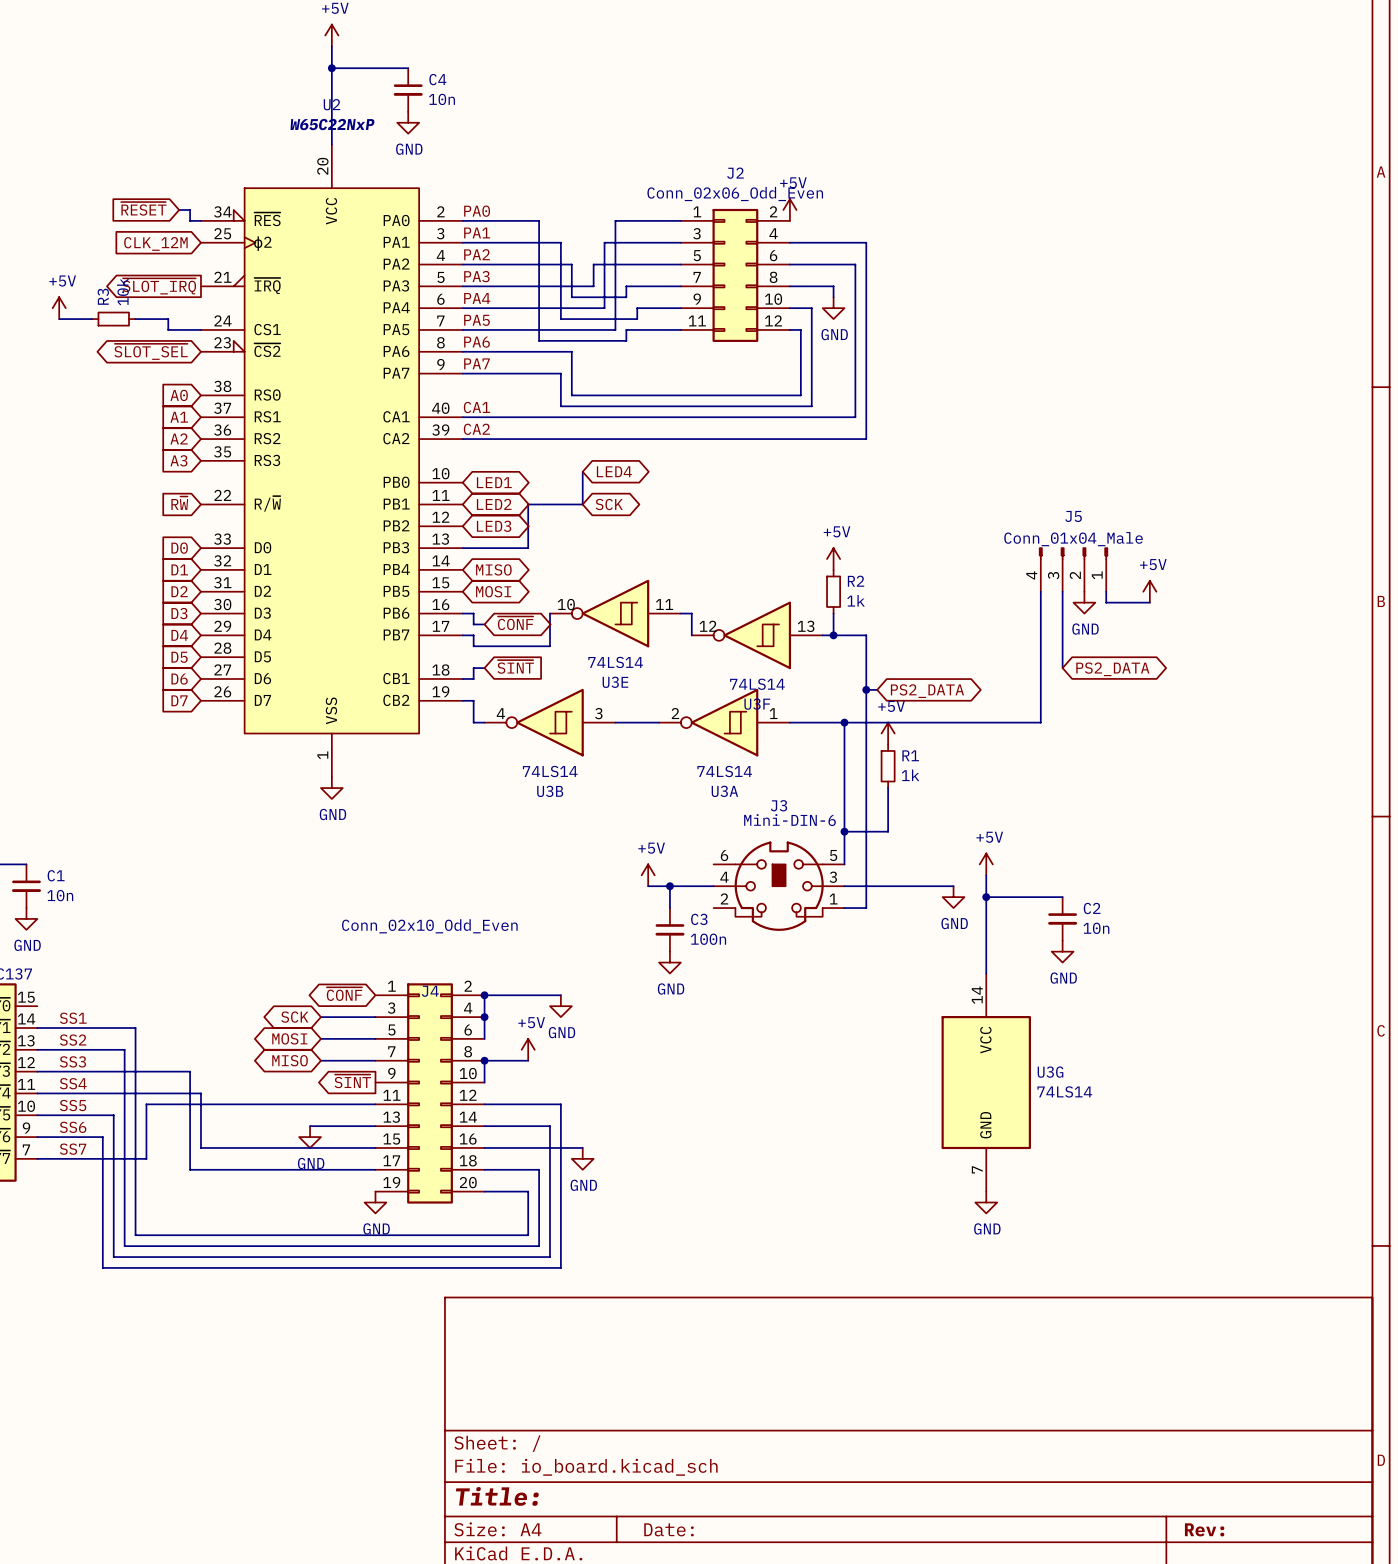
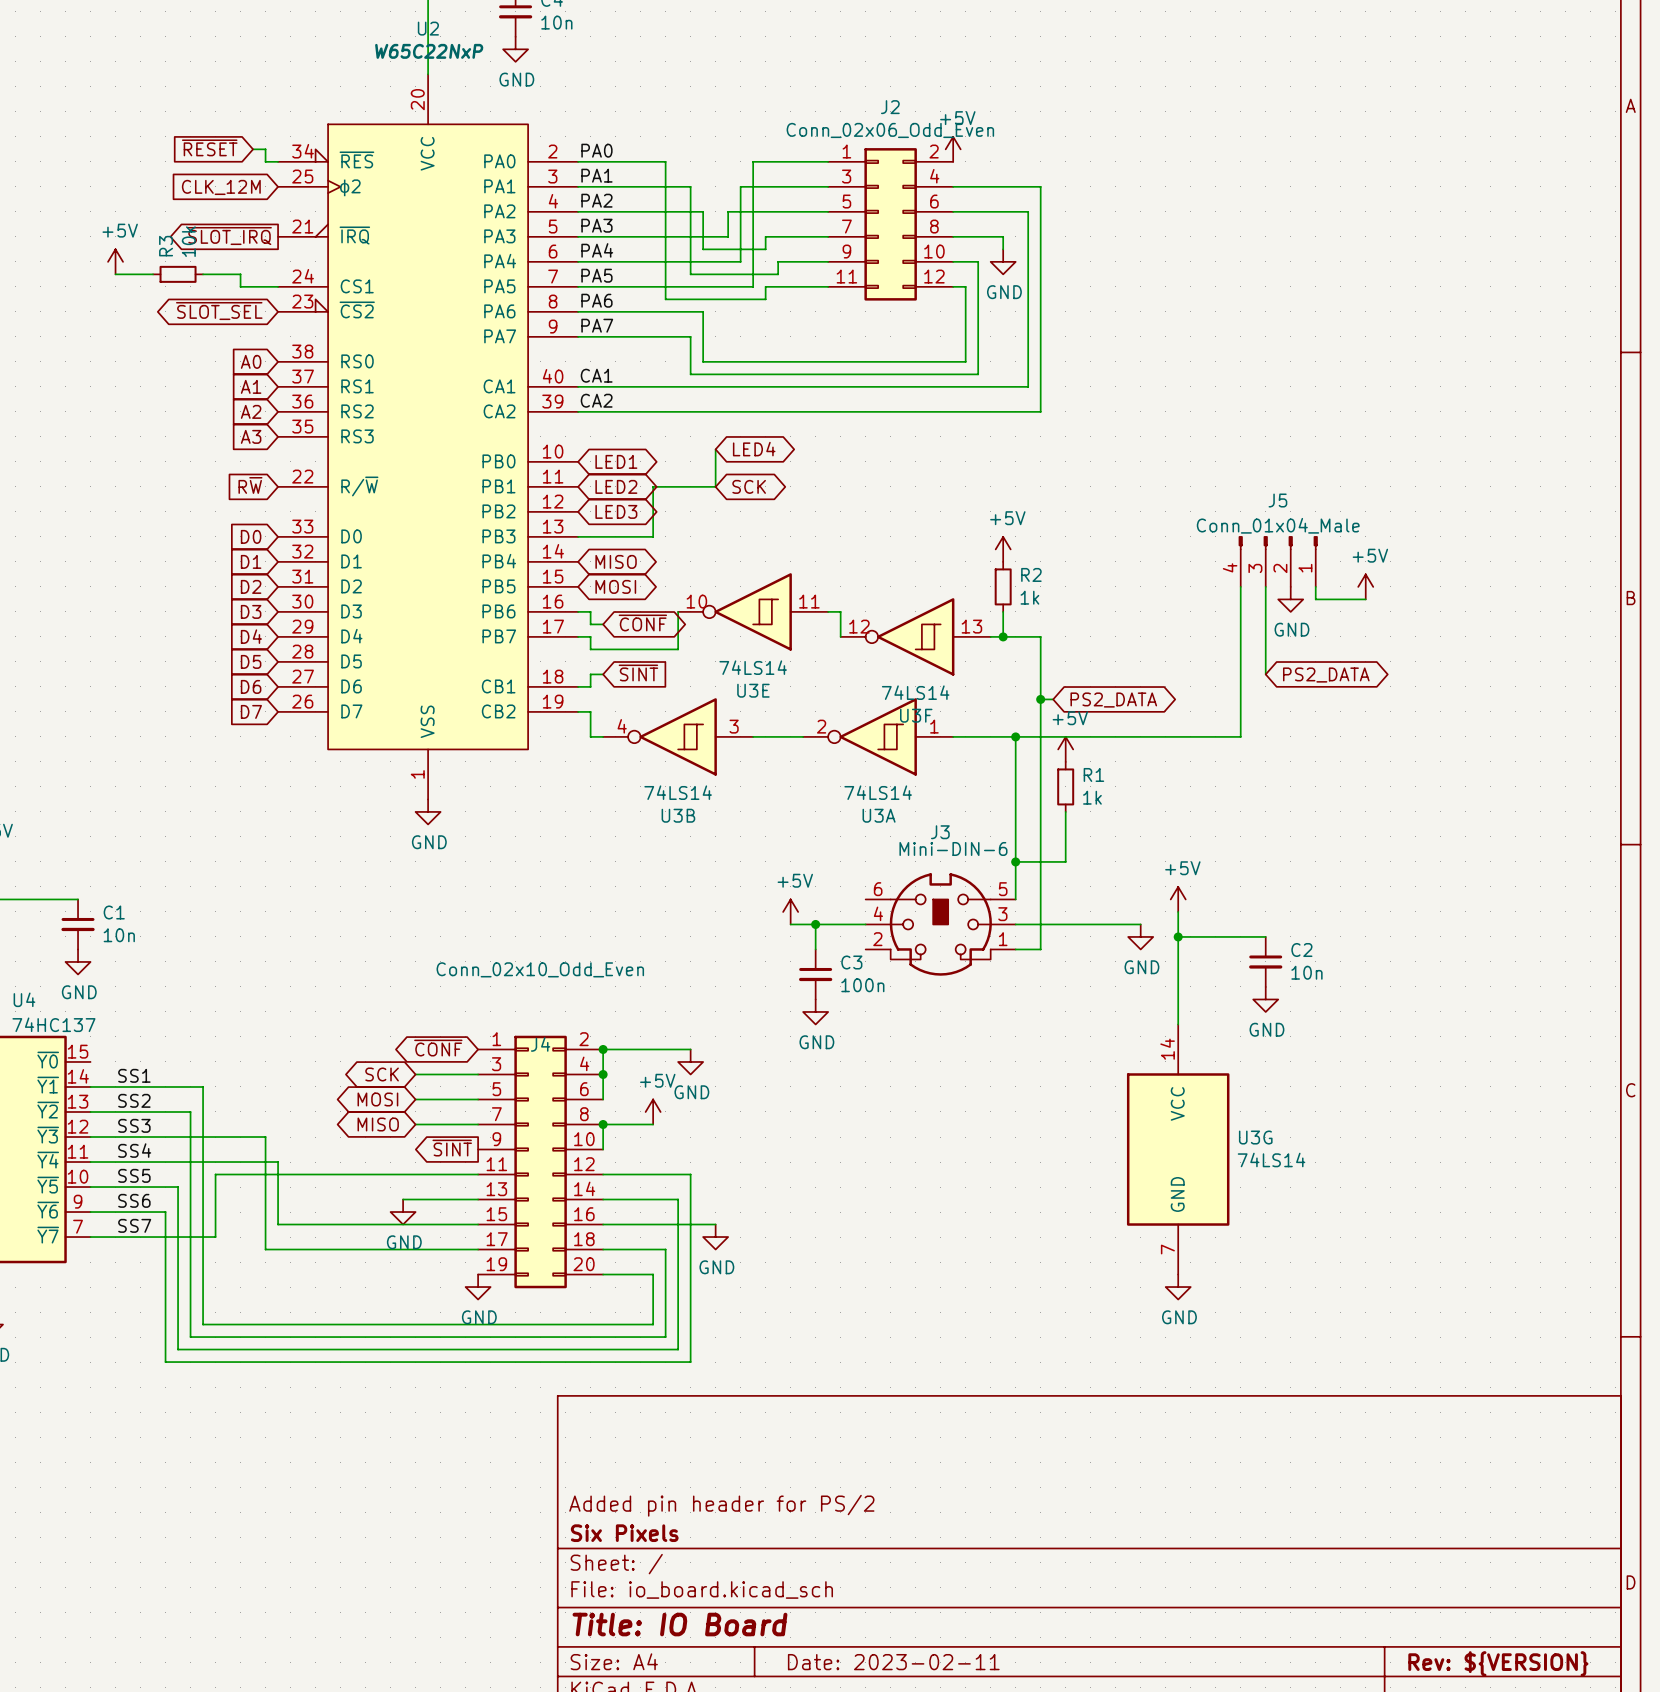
title block: none -> Added pin header for PS/2 (721, 1505)
title block: none -> Six Pixels (624, 1533)
title block: Title: (497, 1496) -> Title: IO Board (679, 1624)
title block: Date: (668, 1529) -> Date: 2023-02-11 (893, 1662)
title block: Rev: (1204, 1529) -> Rev: ${VERSION} (1498, 1663)

